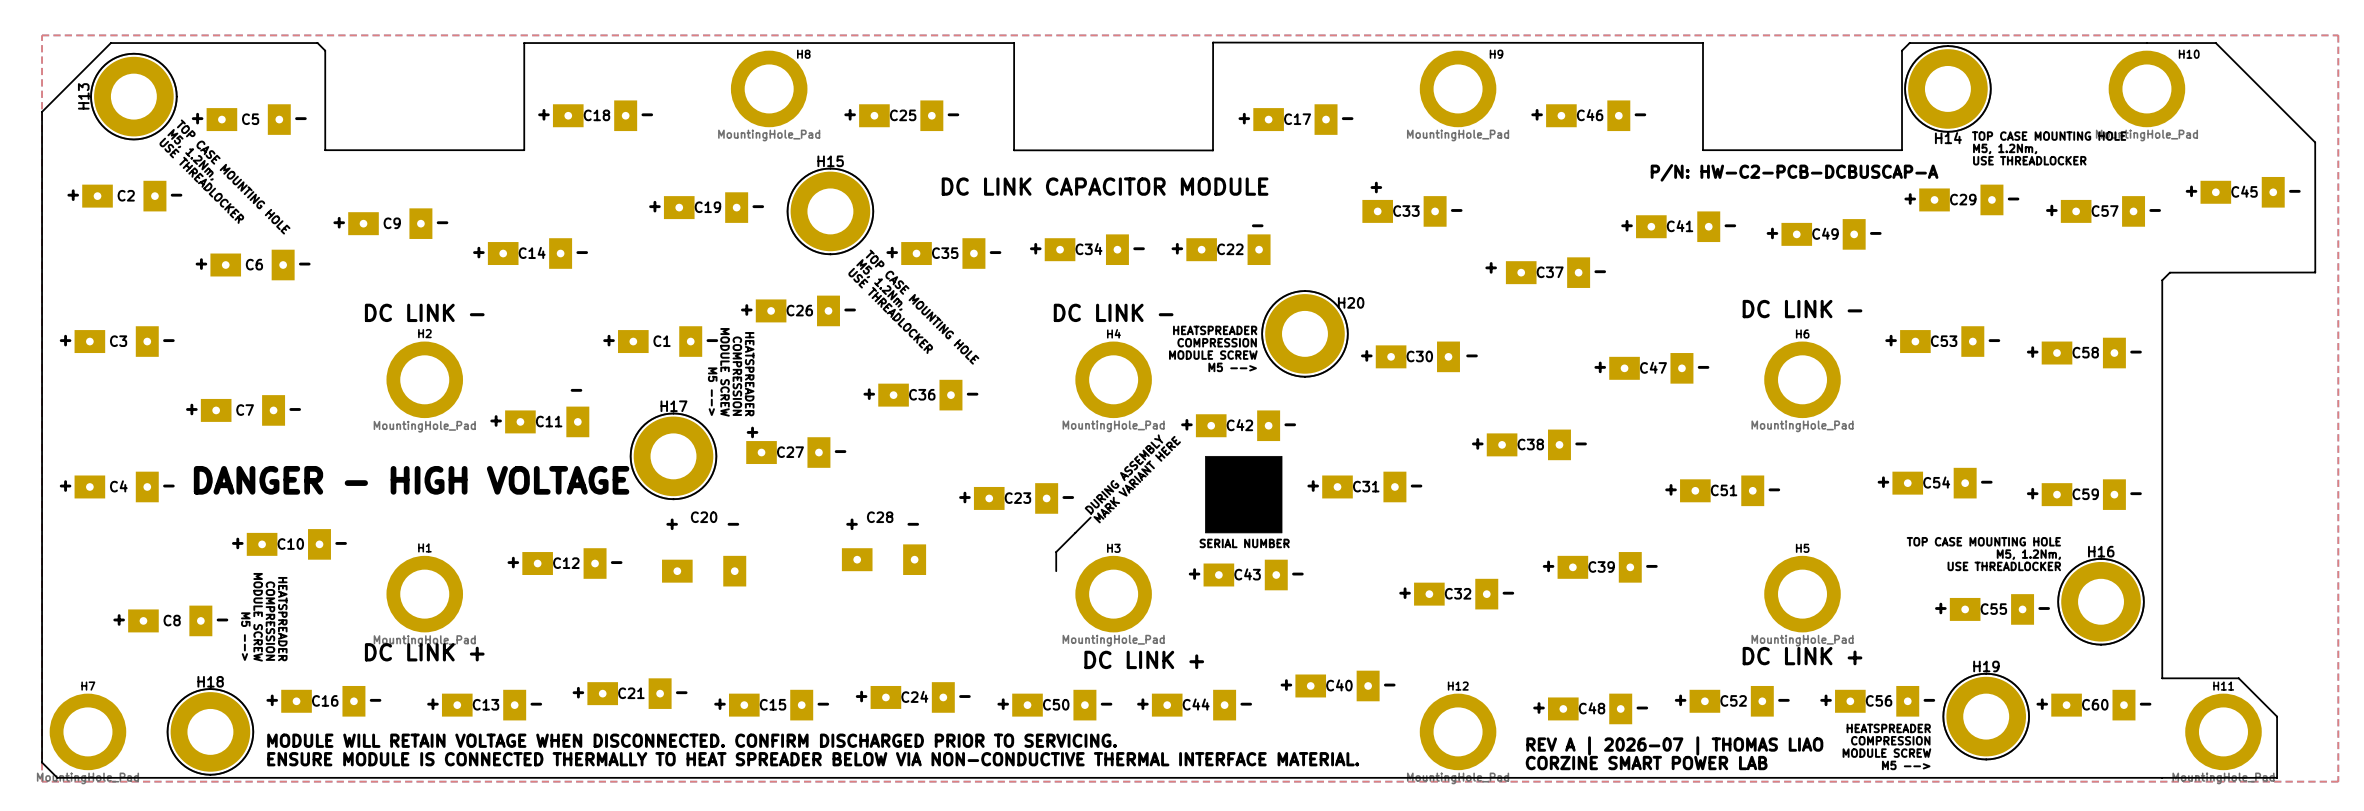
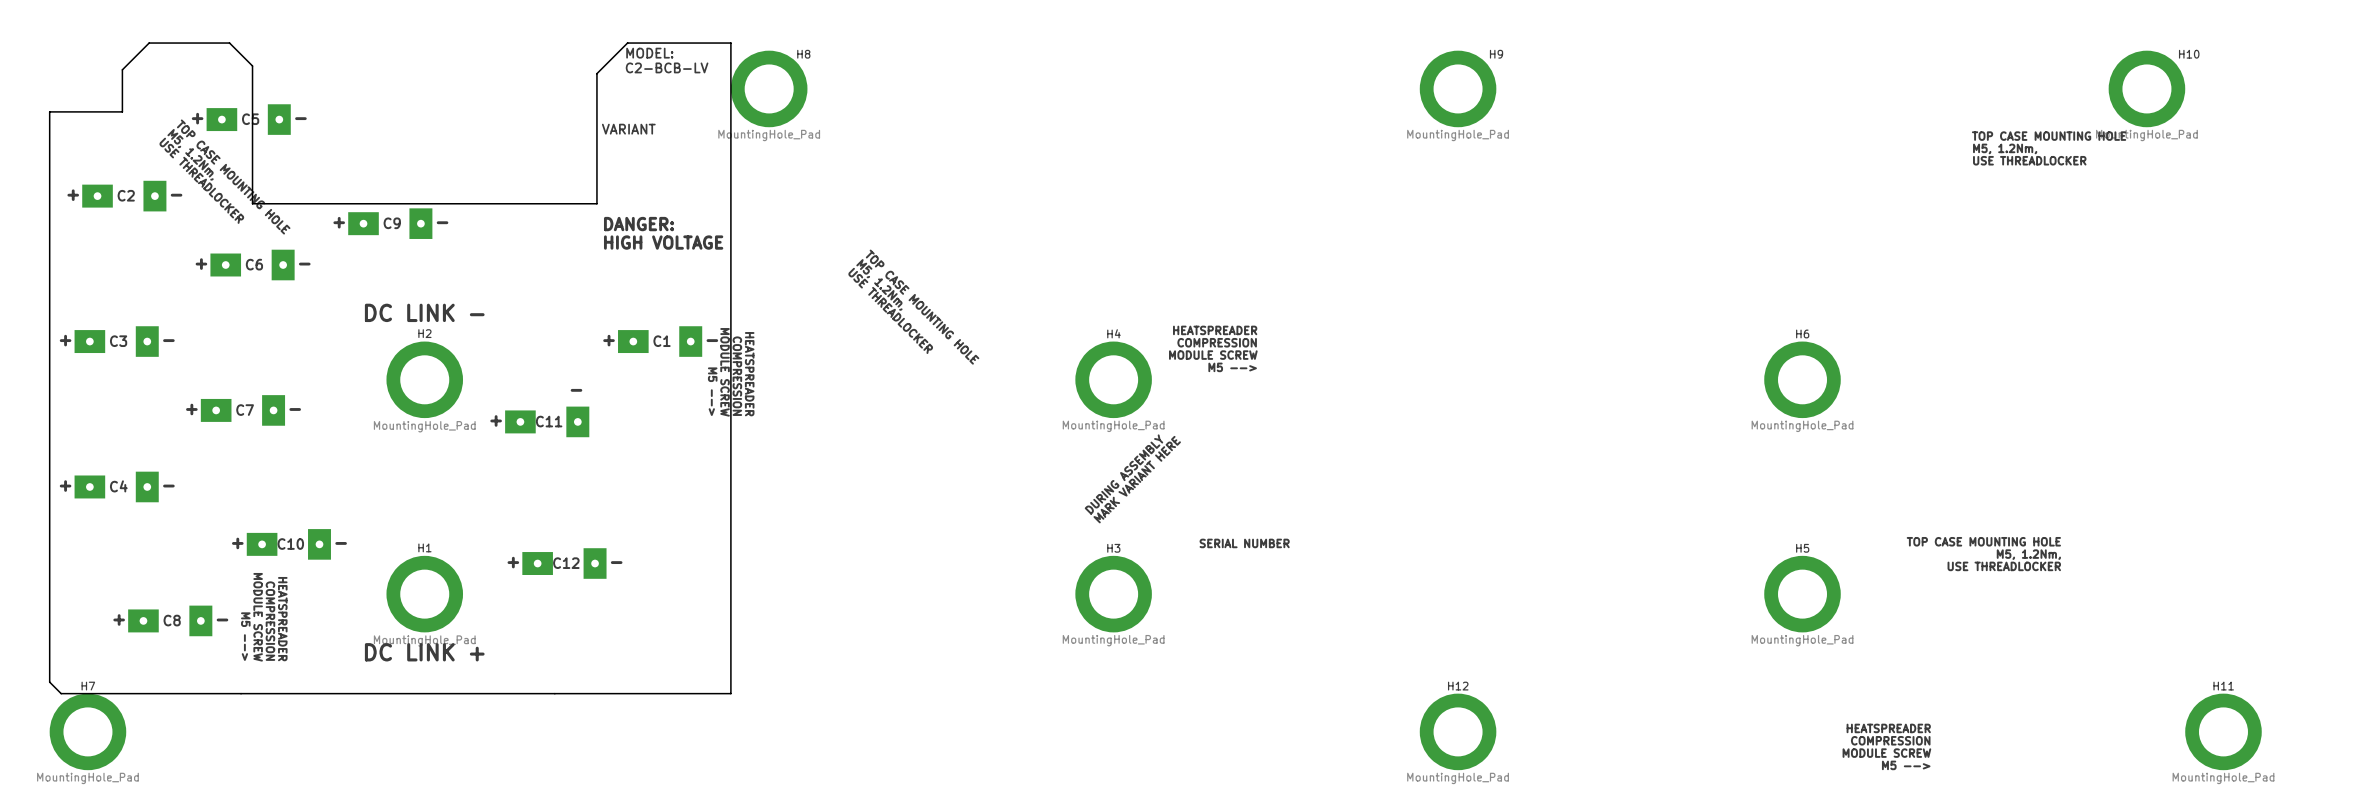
top zone outline: (42, 35) (2338, 35) (2338, 781) (42, 781) (42, 35) -> none
board edge: (149, 43) (110, 43) (42, 111) (42, 762) (57, 777) (2277, 777) (2277, 716) (2238, 678) (2162, 678) (2162, 280) (2169, 272) (2315, 272) (2315, 142) (2215, 43) (1909, 43) (1902, 50) (1902, 150) (1703, 150) (1703, 42) (1213, 42) (1213, 150) (1014, 150) (1014, 43) (730, 43) -> (149, 43) (122, 69) (122, 111) (49, 111) (49, 682) (61, 693) (730, 693) (730, 43)
board edge: (229, 43) (317, 43) (325, 50) (325, 150) (524, 150) (524, 43) (627, 43) -> (229, 43) (252, 65) (252, 203) (596, 203) (596, 73) (627, 43)
text: none -> MODEL: (649, 53)
text: none -> C2-BCB-LV (667, 67)
H14: (1947, 88) -> none
H13: (133, 96) -> none
C18: (595, 115) -> none
C25: (901, 115) -> none
C46: (1588, 115) -> none
C17: (1295, 119) -> none
text: none -> VARIANT (628, 129)
text: P/N: HW-C2-PCB-DCBUSCAP-A (1794, 172) -> none
text: DC LINK CAPACITOR MODULE (1105, 186) -> none
C45: (2242, 192) -> none
C29: (1961, 199) -> none
C19: (706, 207) -> none
H15: (830, 211) -> none
C33: (1404, 211) -> none
C57: (2102, 211) -> none
text: none -> DANGER: (639, 224)
C41: (1678, 226) -> none
C49: (1823, 234) -> none
text: none -> HIGH VOLTAGE (663, 242)
C34: (1086, 249) -> none
C22: (1228, 249) -> none
C14: (529, 253) -> none
C35: (943, 253) -> none
C37: (1548, 272) -> none
text: DC LINK - (1802, 309) -> none
C26: (797, 310) -> none
text: DC LINK - (1113, 312) -> none
H20: (1304, 333) -> none
C53: (1942, 341) -> none
C58: (2083, 353) -> none
C30: (1417, 356) -> none
C47: (1651, 368) -> none
C36: (920, 395) -> none
C42: (1238, 425) -> none
C38: (1528, 444) -> none
C27: (788, 452) -> none
drawing: [1205, 455, 1283, 534] -> none
H17: (673, 456) -> none
text: DANGER - HIGH VOLTAGE (411, 480) -> none
C54: (1934, 483) -> none
C31: (1364, 486) -> none
C51: (1722, 490) -> none
C59: (2083, 494) -> none
C23: (1016, 498) -> none
line: (1090, 517) (1056, 552) (1056, 571) -> none
C28: (883, 559) -> none
C39: (1599, 567) -> none
C20: (704, 571) -> none
C43: (1245, 574) -> none
C32: (1456, 594) -> none
H16: (2101, 601) -> none
C55: (1991, 609) -> none
text: DC LINK + (1802, 656) -> none
text: DC LINK + (1144, 659) -> none
C40: (1337, 685) -> none
C21: (629, 693) -> none
C24: (912, 697) -> none
C16: (323, 701) -> none
C52: (1731, 701) -> none
C56: (1877, 701) -> none
C13: (484, 705) -> none
C15: (771, 705) -> none
C50: (1054, 705) -> none
C44: (1193, 705) -> none
C60: (2093, 705) -> none
C48: (1590, 708) -> none
H19: (1986, 716) -> none
H18: (210, 731) -> none
text: MODULE WILL RETAIN VOLTAGE WHEN DISCONNECTED. CONFIRM DISCHARGED PRIOR TO SERVICING. (692, 740) -> none
text: REV A | 2026-07 | THOMAS LIAO (1674, 745) -> none
text: ENSURE MODULE IS CONNECTED THERMALLY TO HEAT SPREADER BELOW VIA NON-CONDUCTIVE THERMAL INTERFACE MATERIAL. (813, 759) -> none
text: CORZINE SMART POWER LAB (1646, 763) -> none

